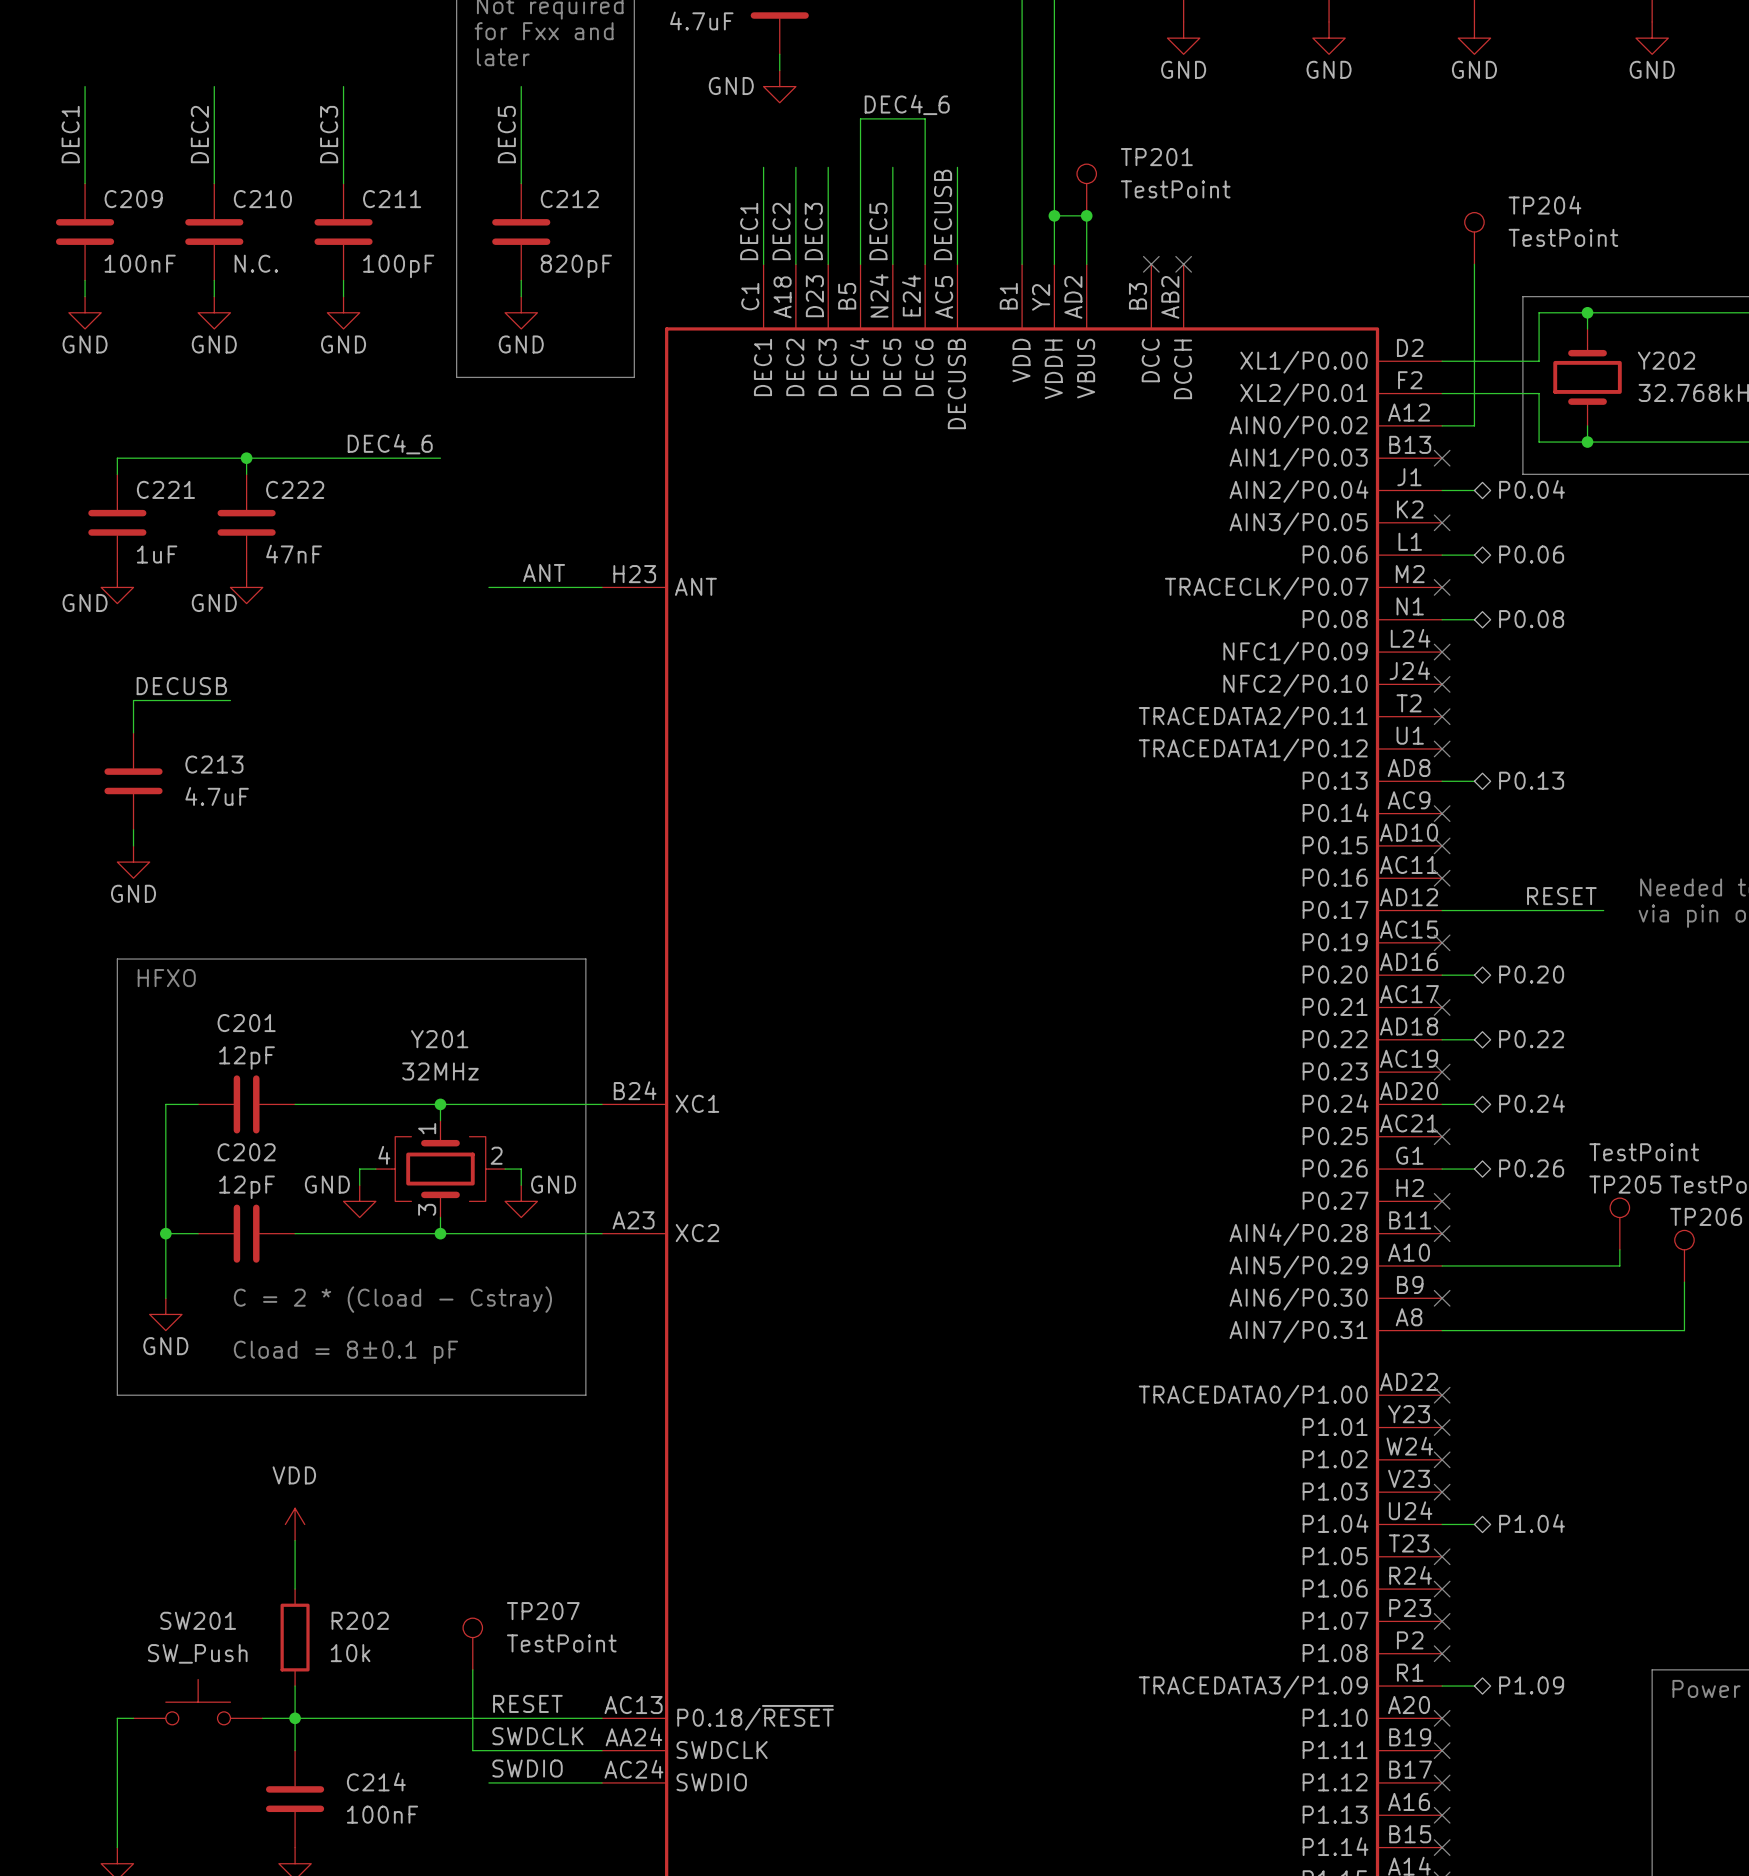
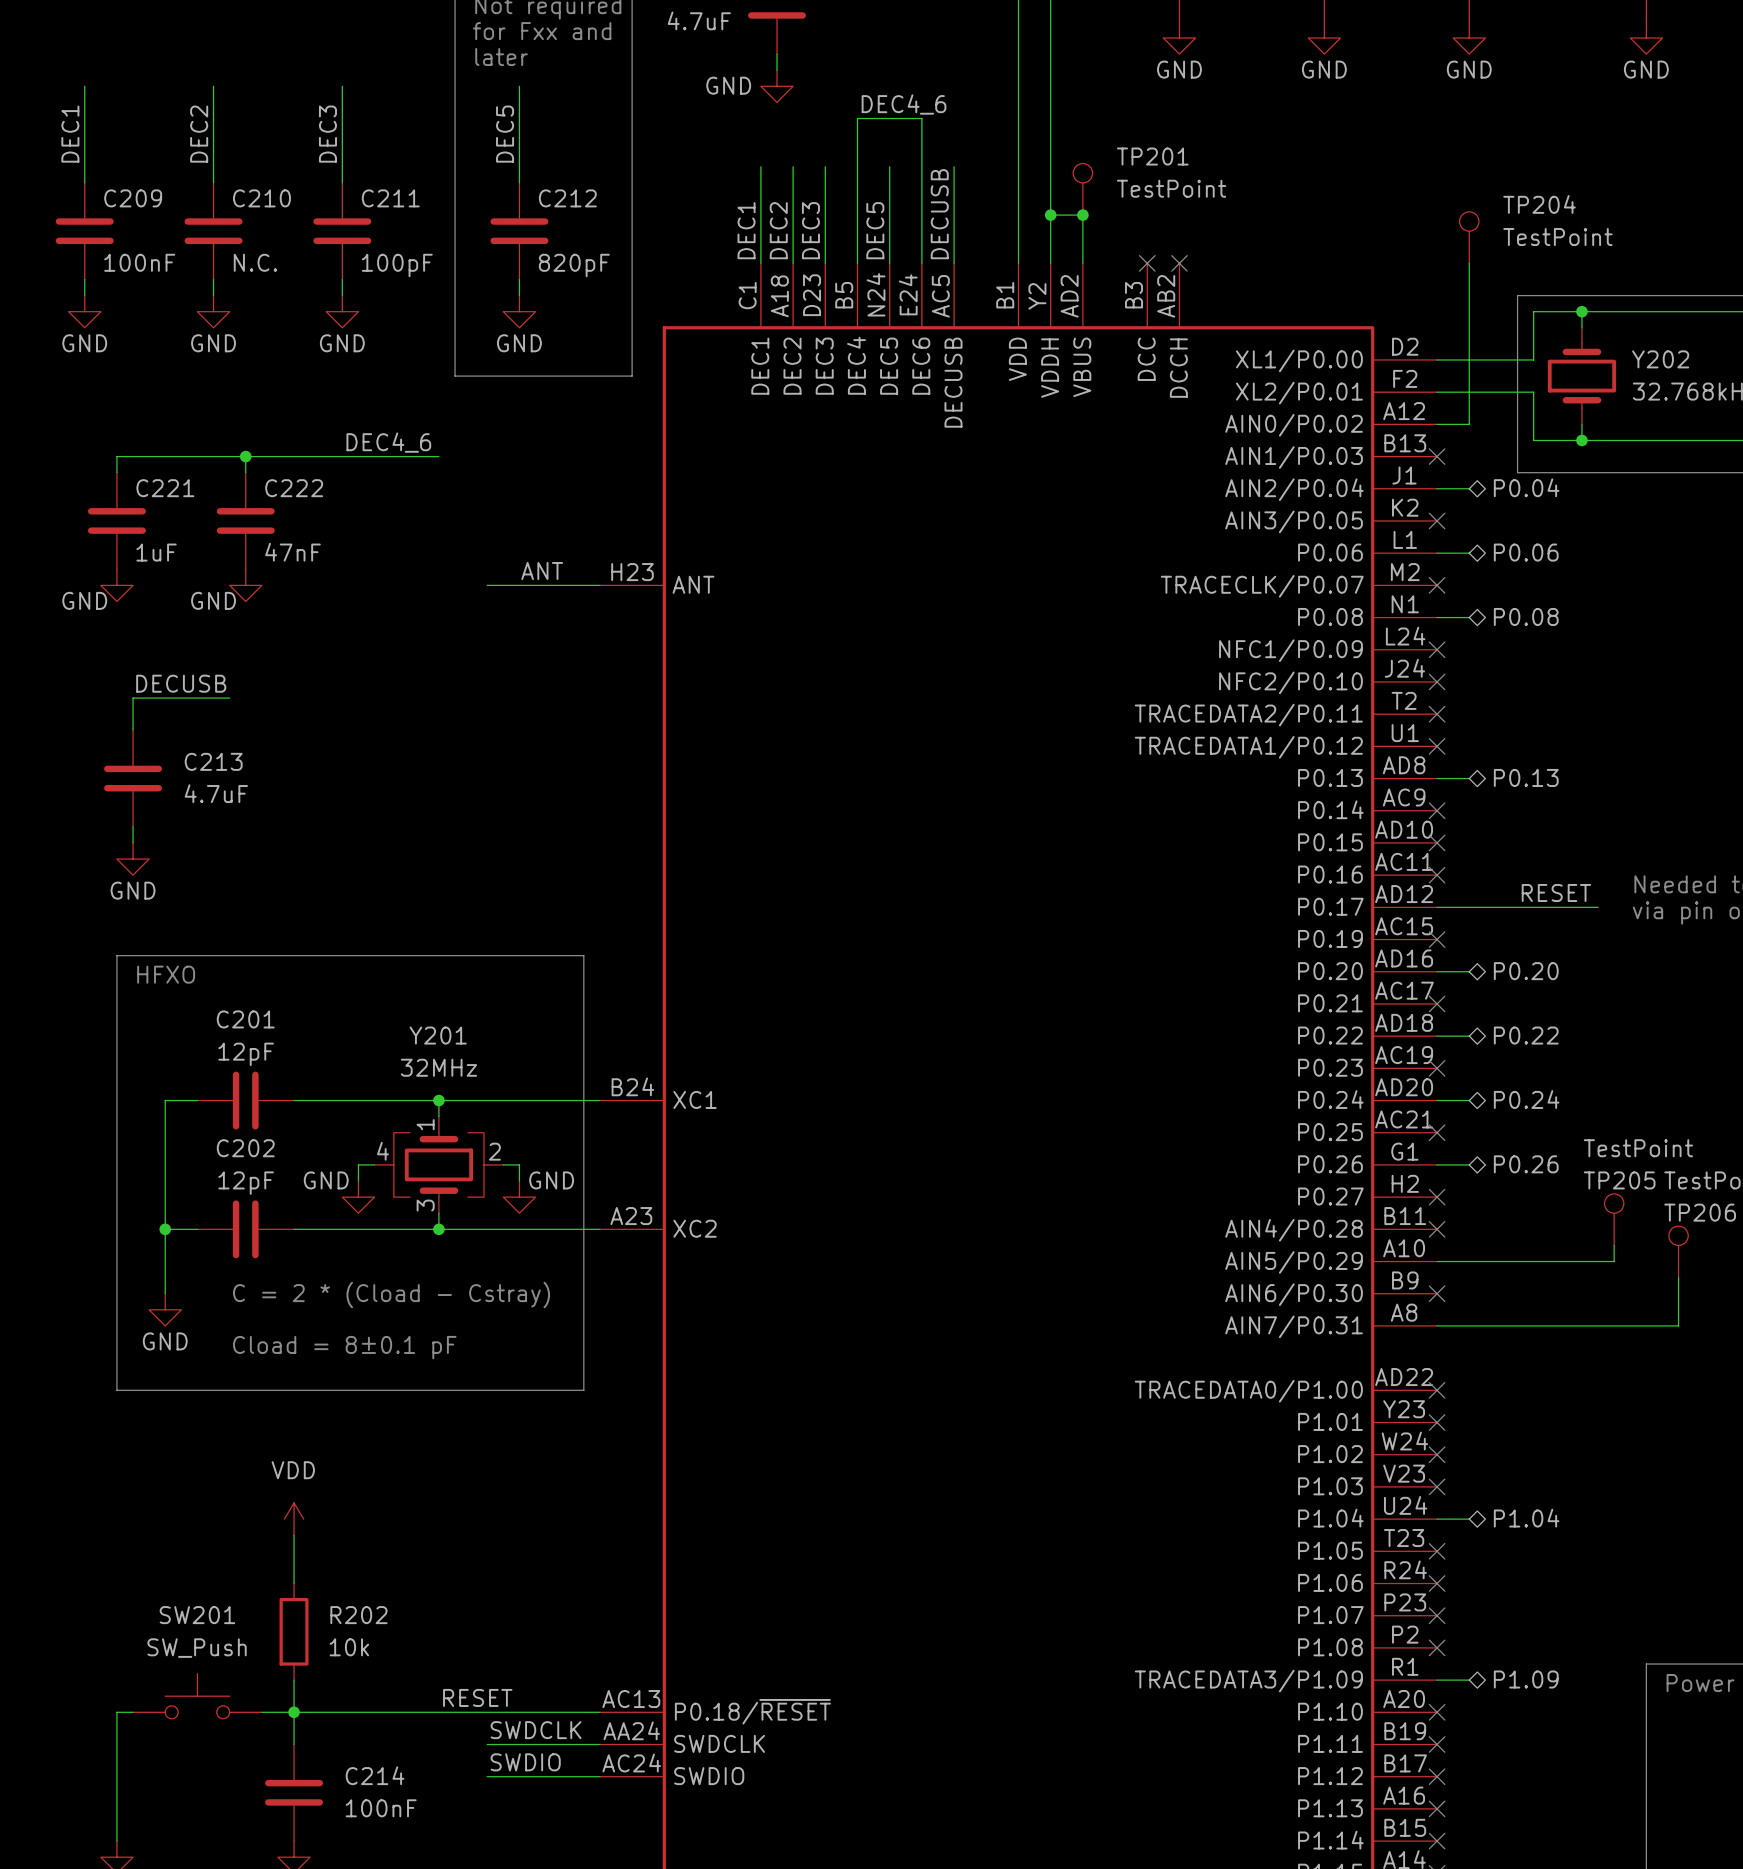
TP207: TestPoint (472, 1644) -> none
wire: (472, 1669) (472, 1750) (488, 1750) -> none
label position: RESET (527, 1703) -> RESET (477, 1697)

